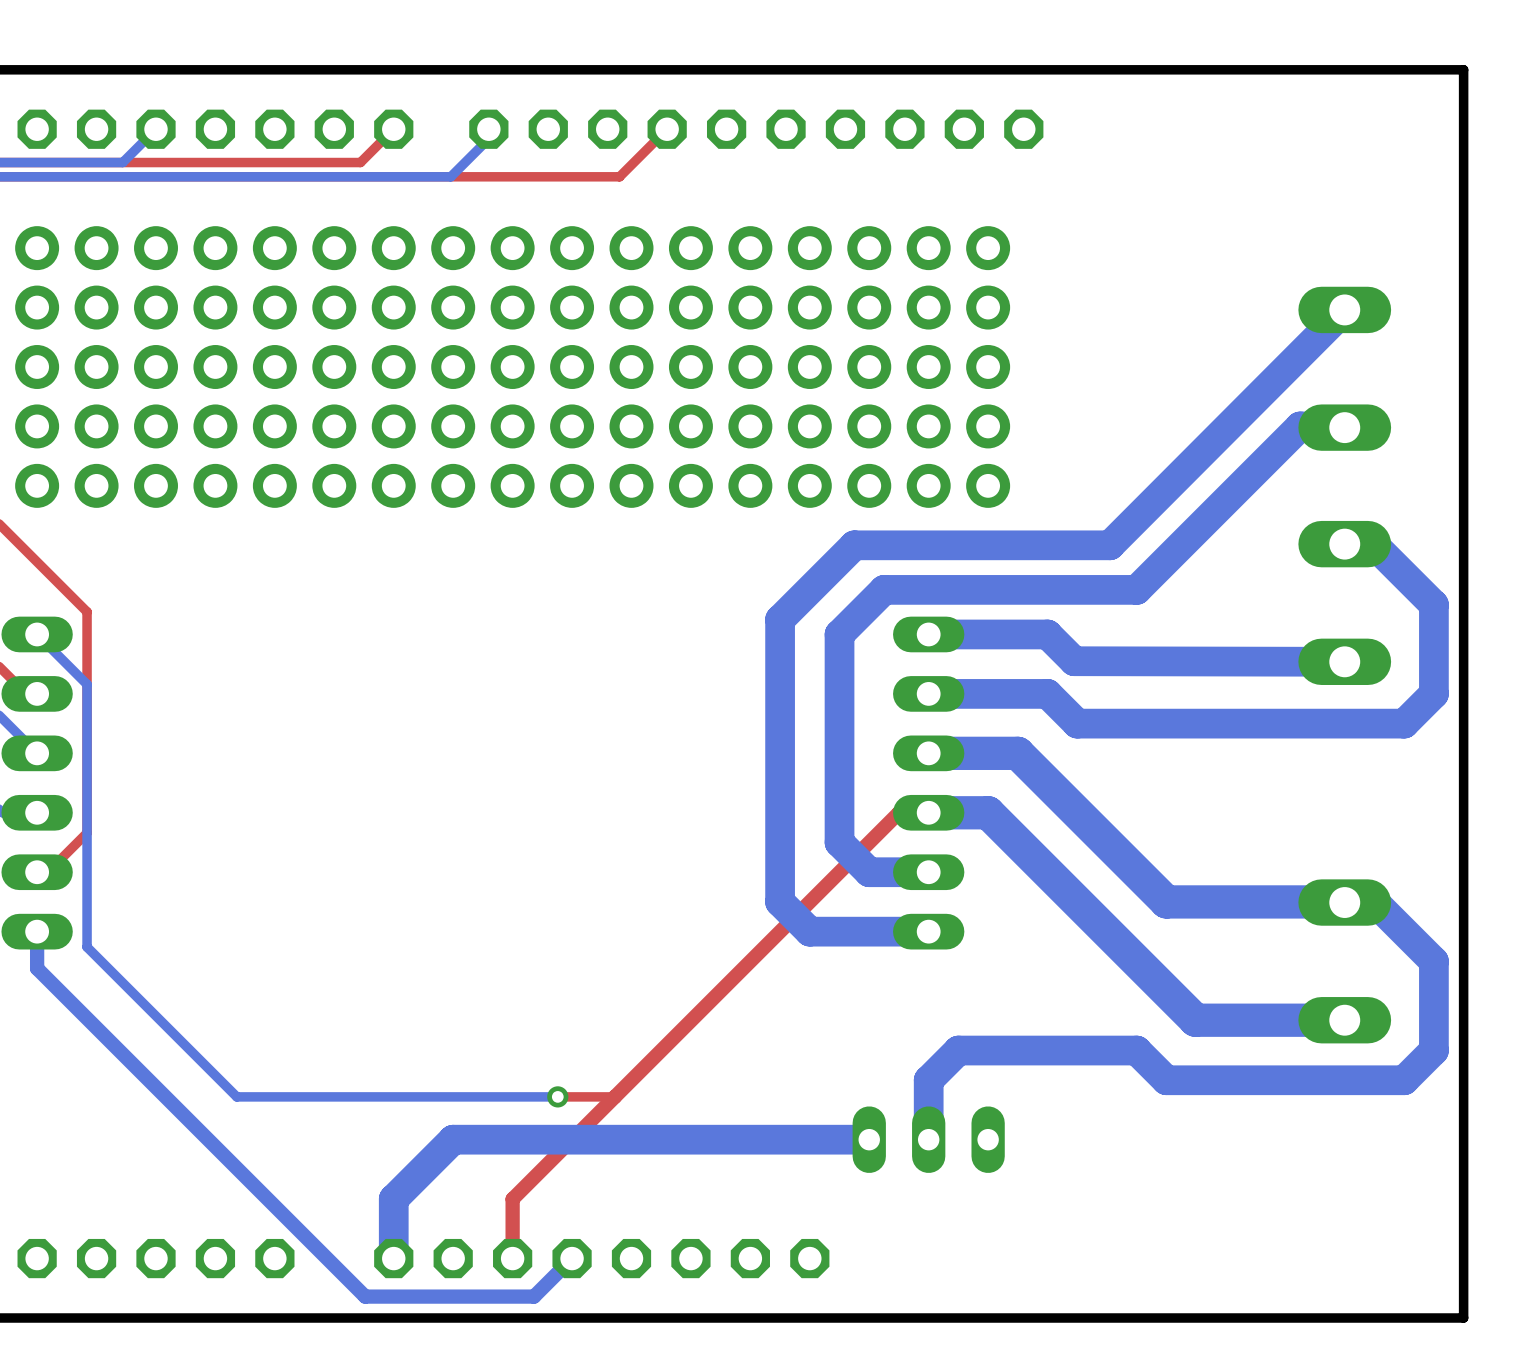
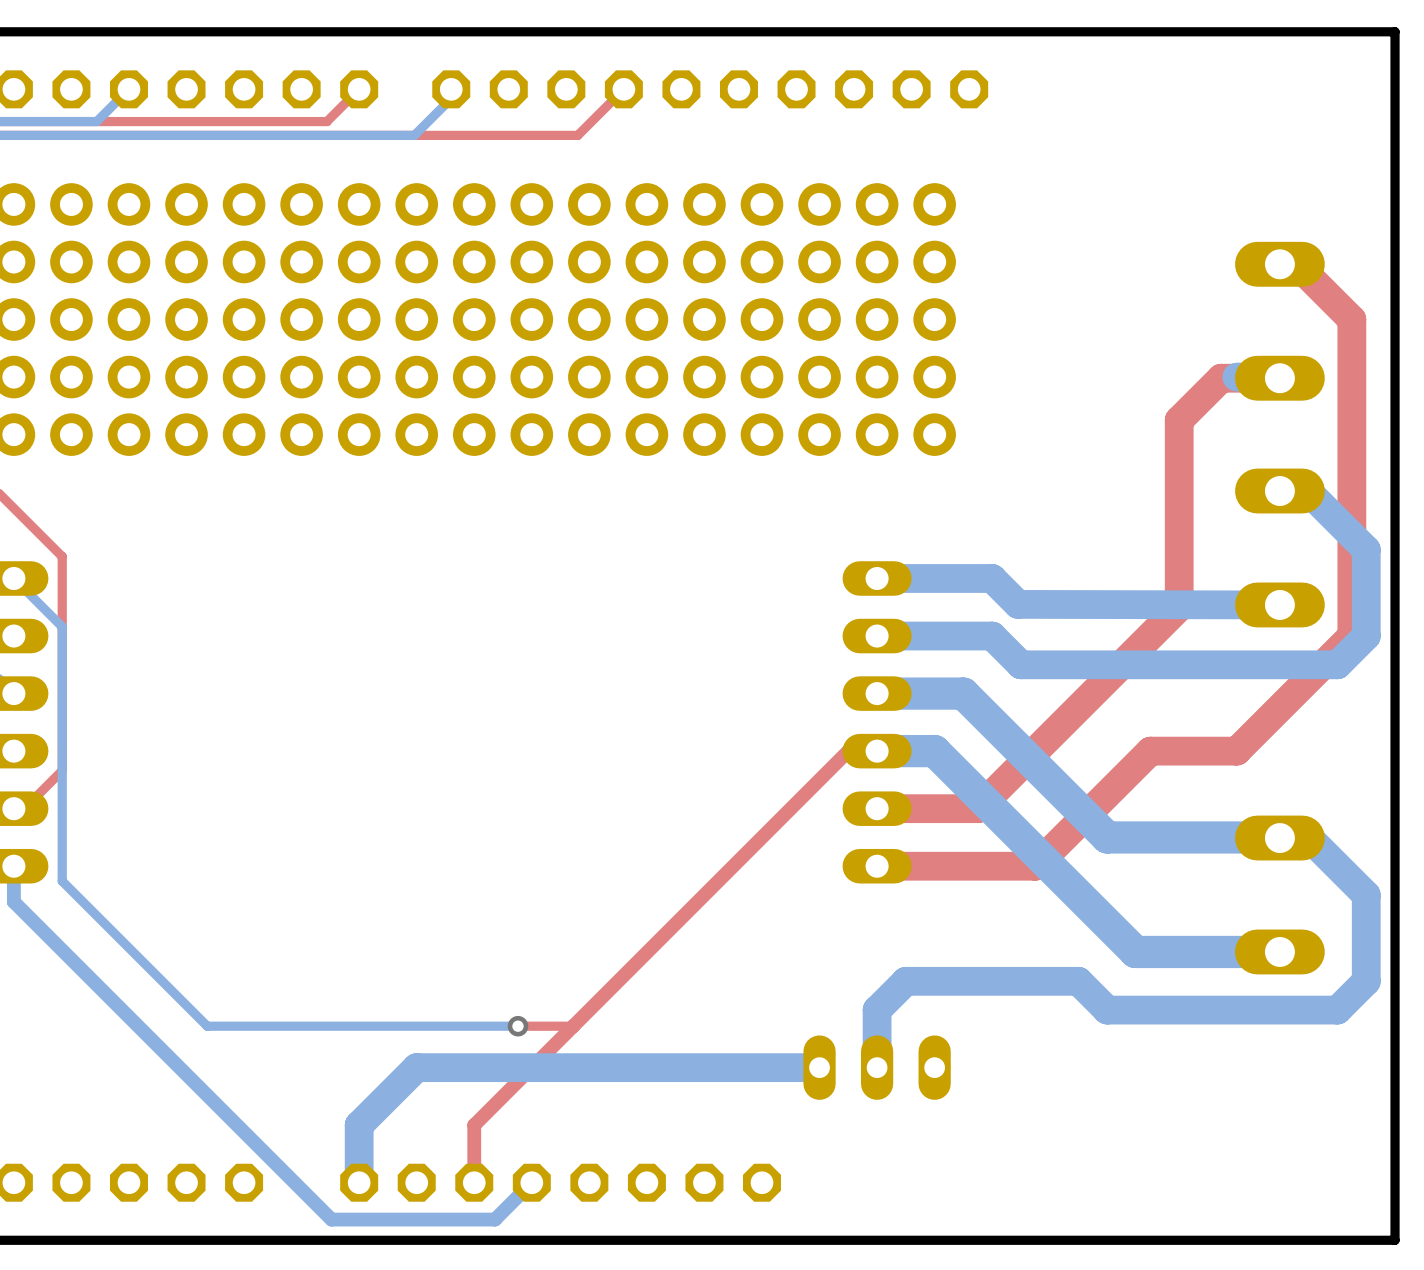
top track: none -> (1279, 264) (1296, 264) (1351, 319) (1351, 636) (1236, 751) (1150, 751) (1035, 866) (862, 866)
bottom track: (1344, 309) (1109, 545) (854, 545) (780, 619) (780, 901) (809, 931) (928, 931) -> none
bottom track: (1300, 426) (1136, 589) (884, 589) (839, 634) (839, 842) (869, 872) (928, 872) -> none
top track: none -> (1279, 378) (1221, 378) (1179, 420) (1179, 607) (977, 808) (877, 808)

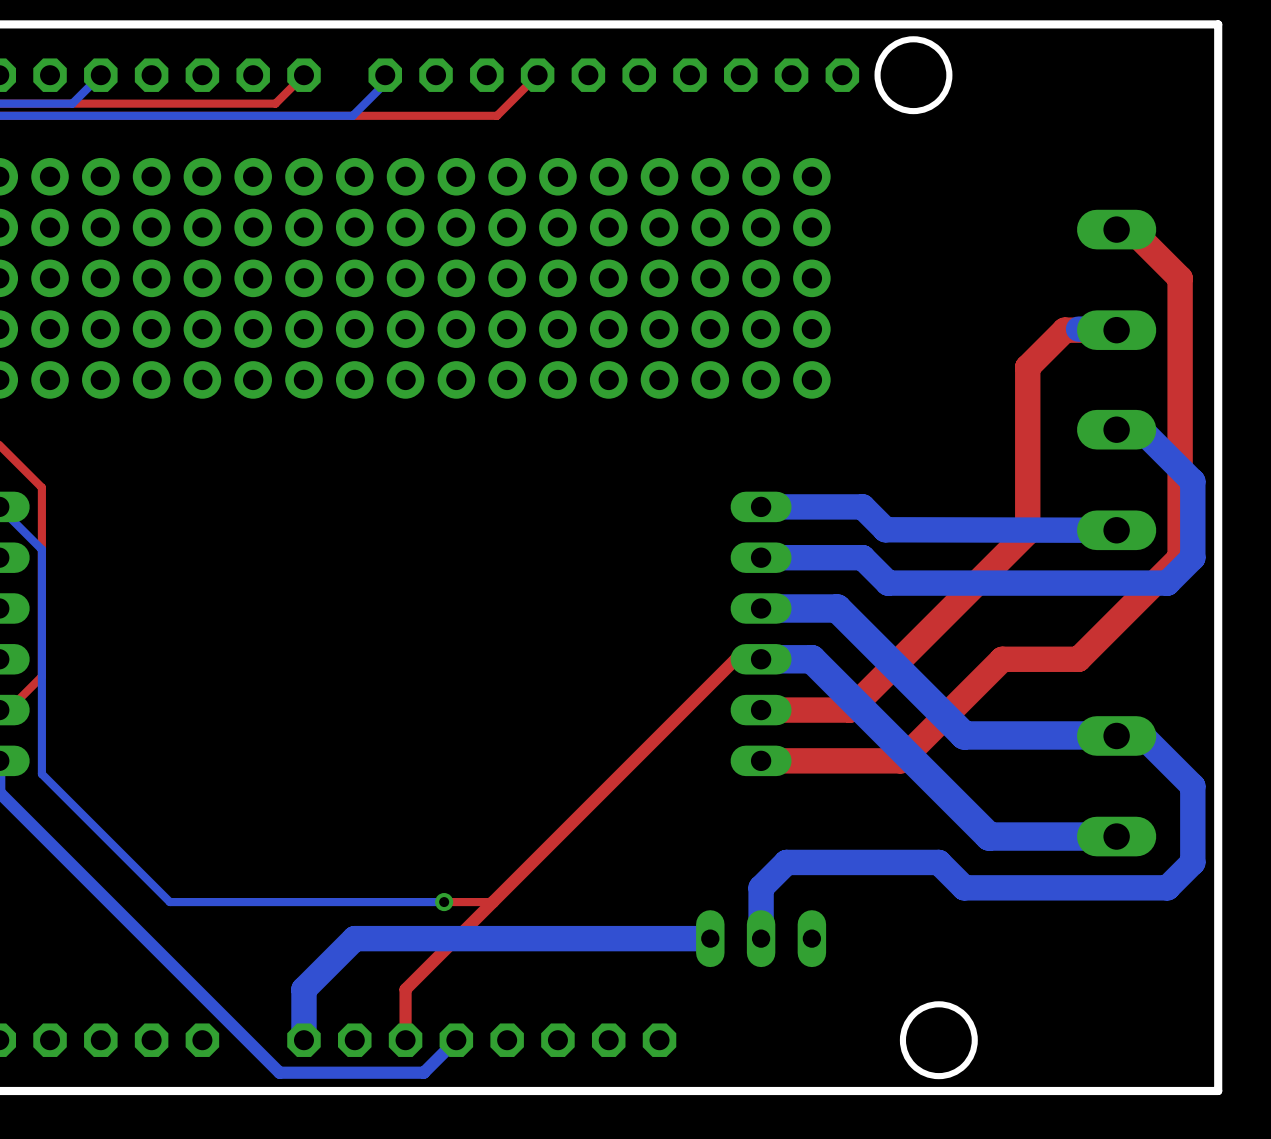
round board edge: none -> [874, 36, 953, 115]
round board edge: none -> [899, 1001, 978, 1080]

